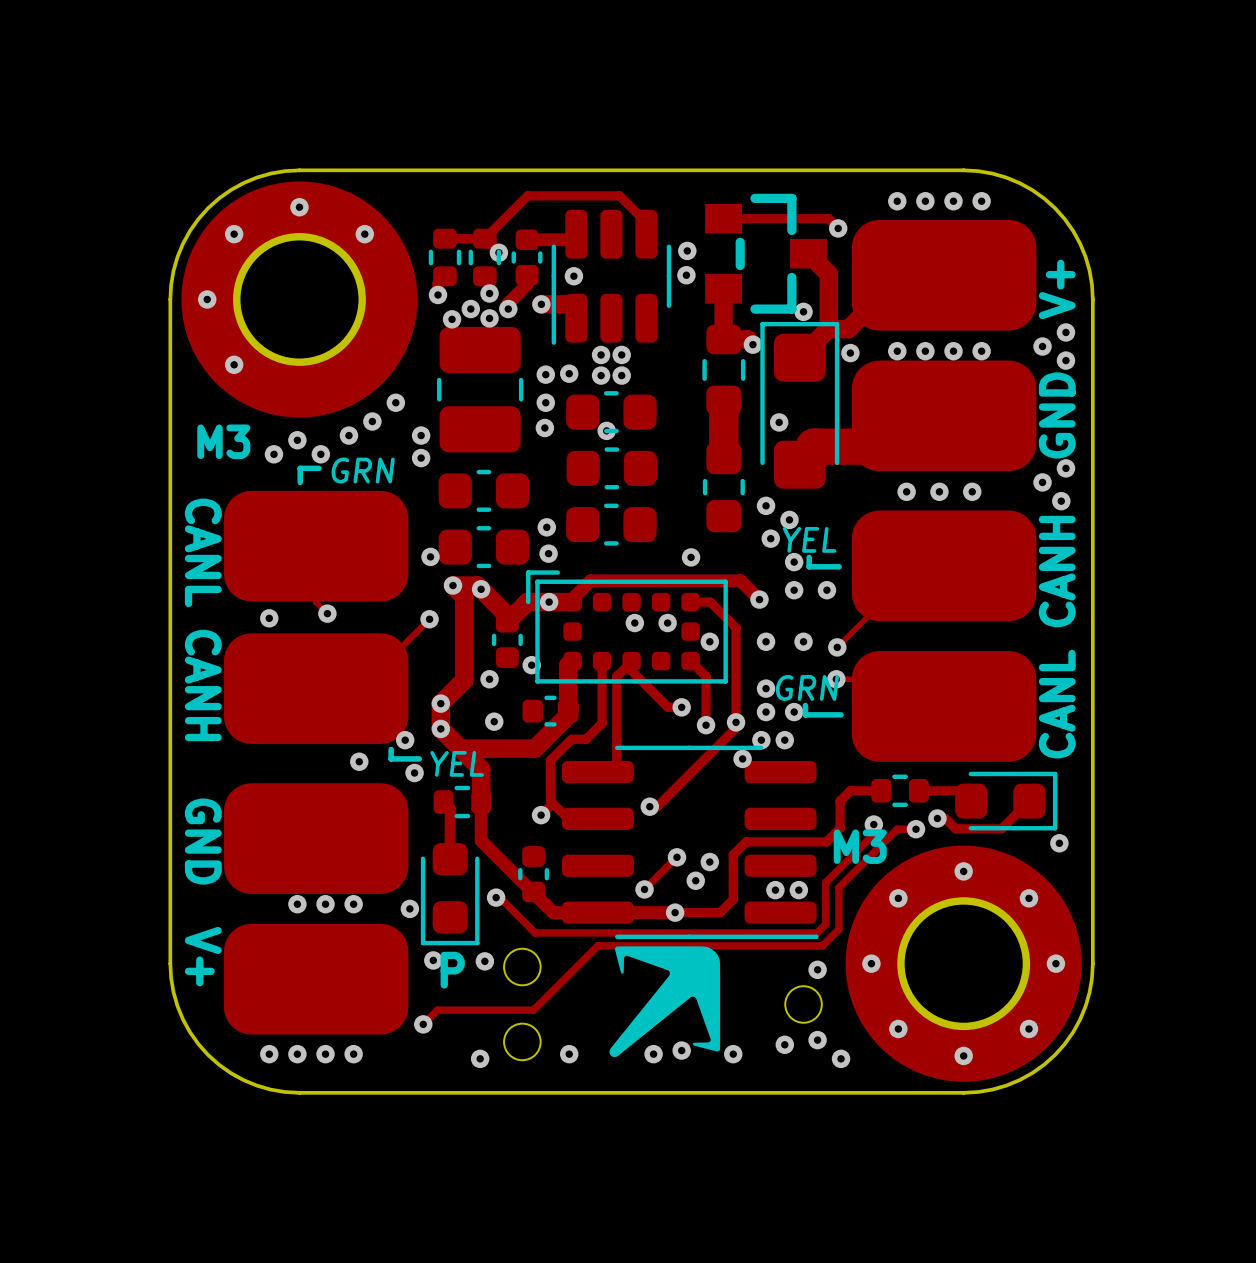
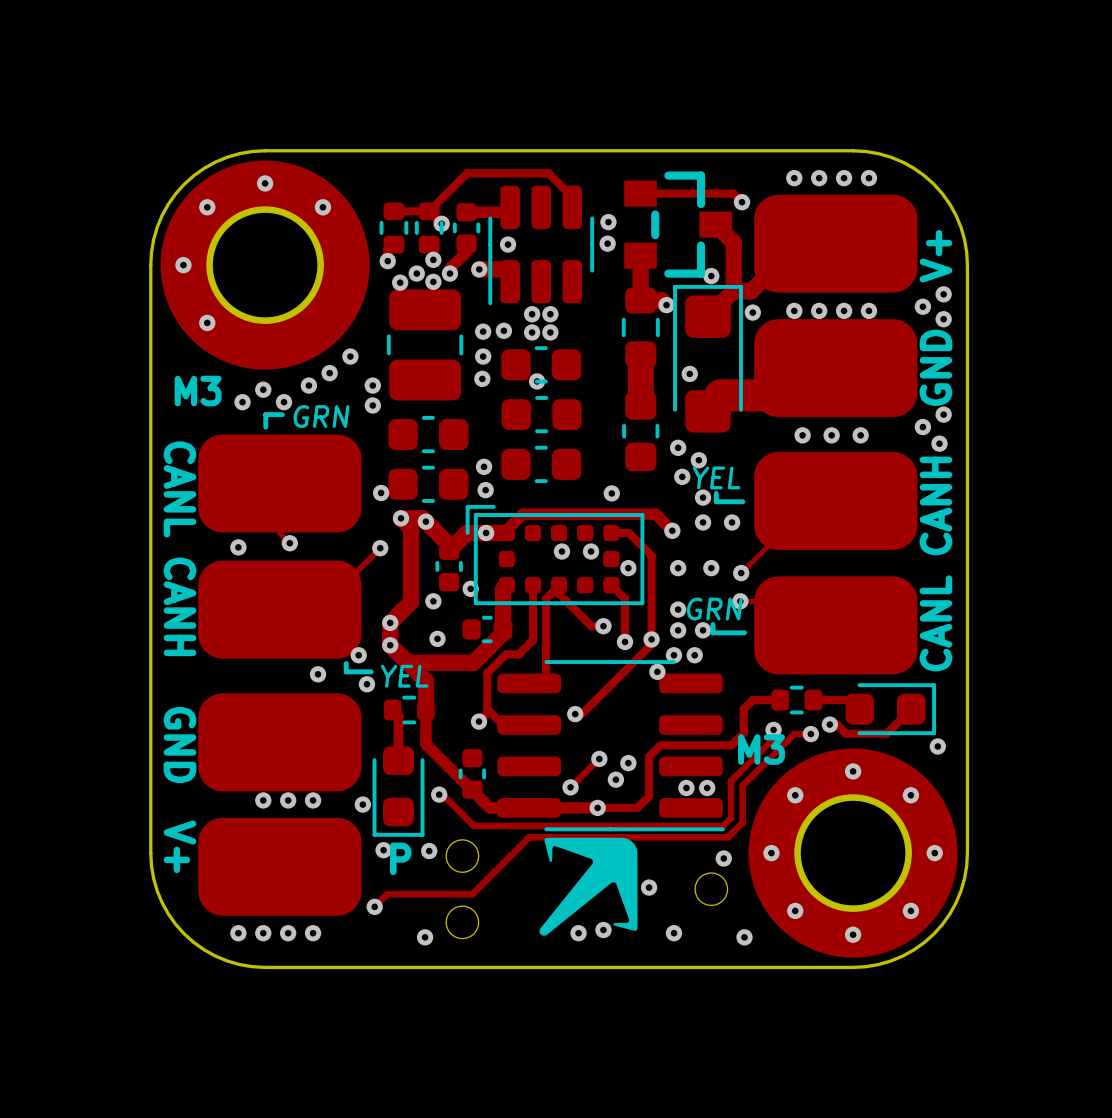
via: none -> (649, 887)
via: (817, 1040) -> none
via: (784, 1044) -> none
via: (569, 1054) -> none
via: (733, 1054) -> none
via: none -> (673, 933)

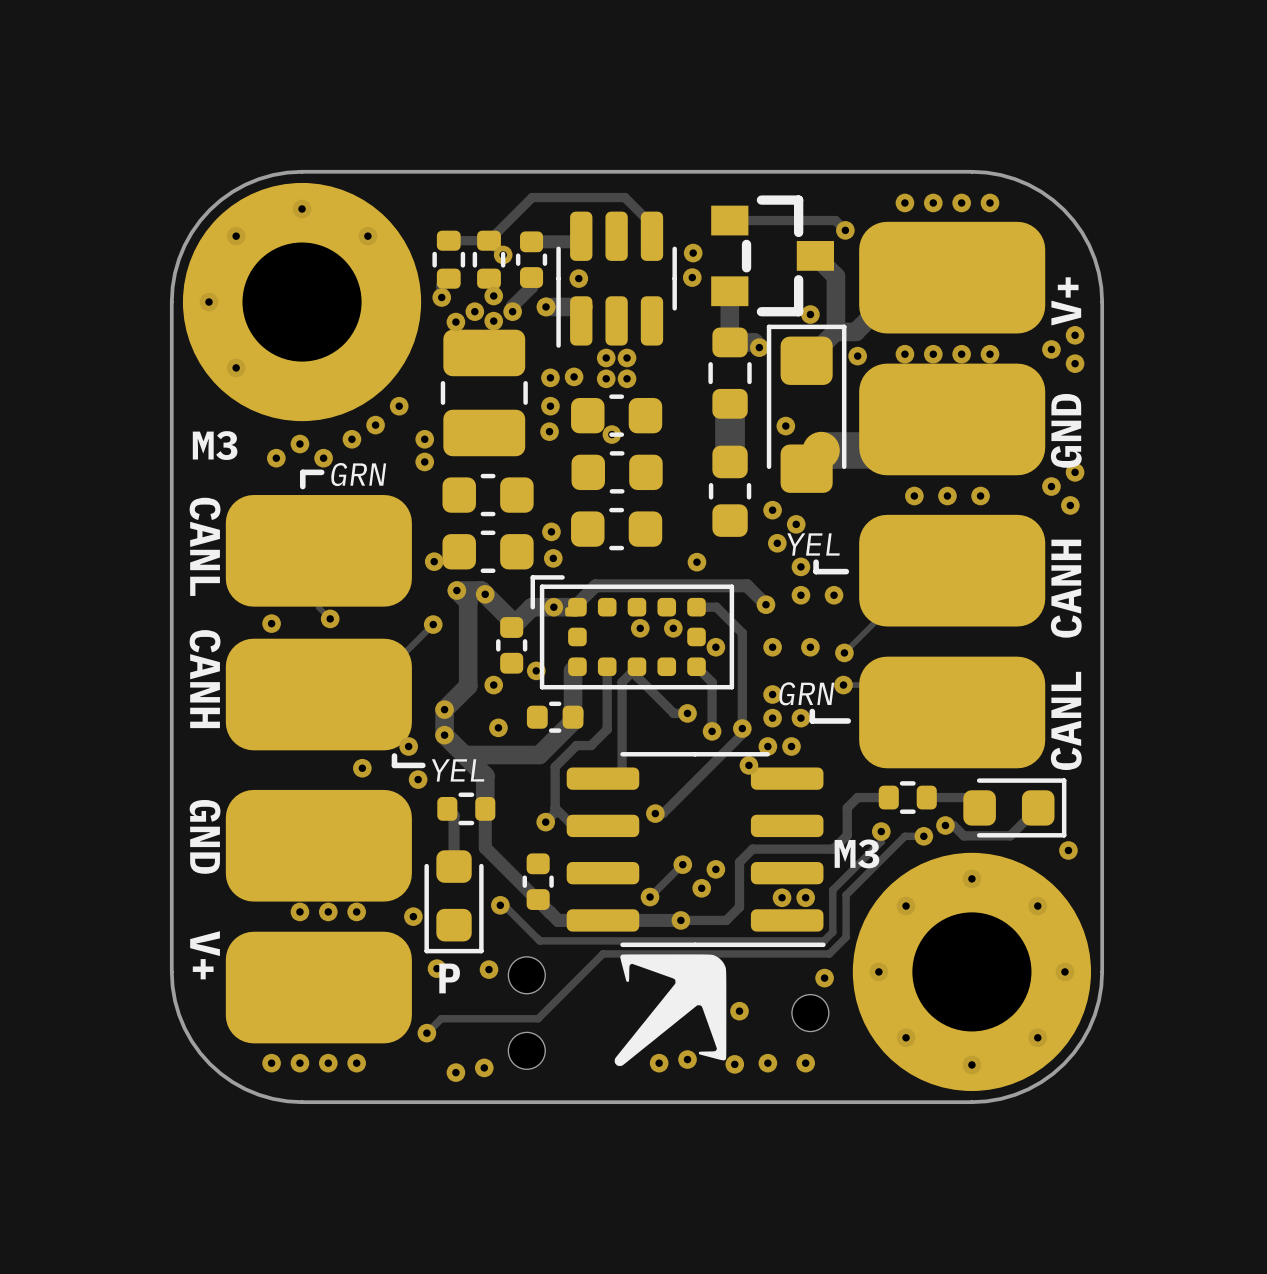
via: none -> (734, 1064)
via position: (744, 937) -> (805, 1063)
via: none -> (455, 1072)

